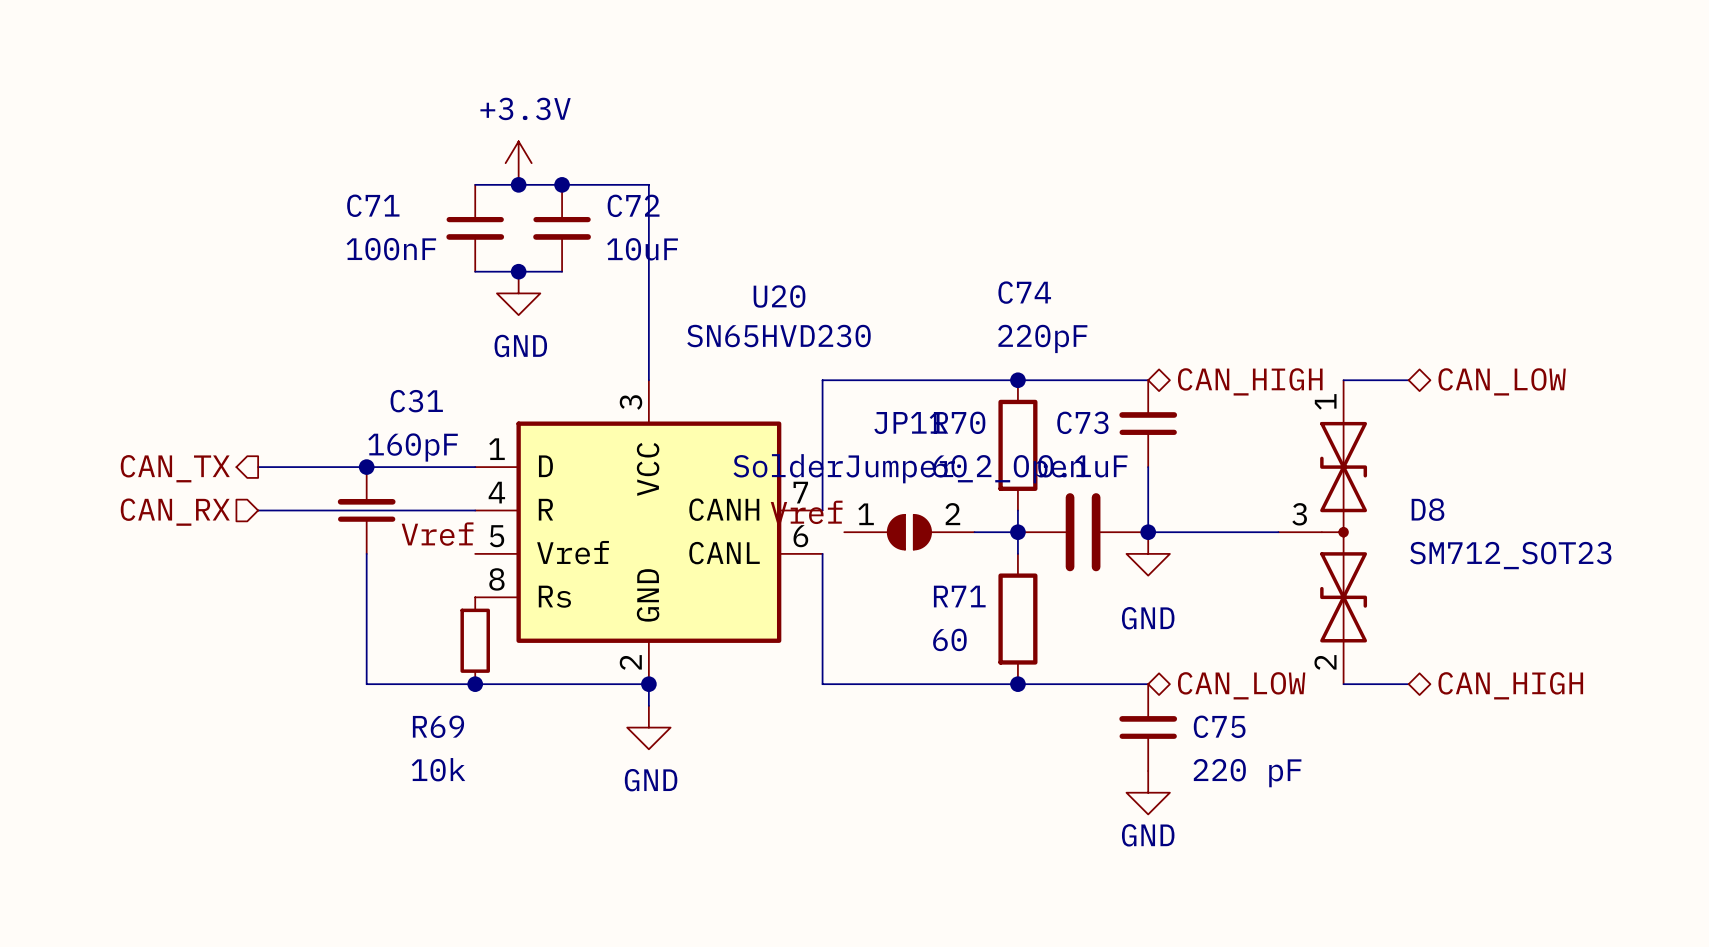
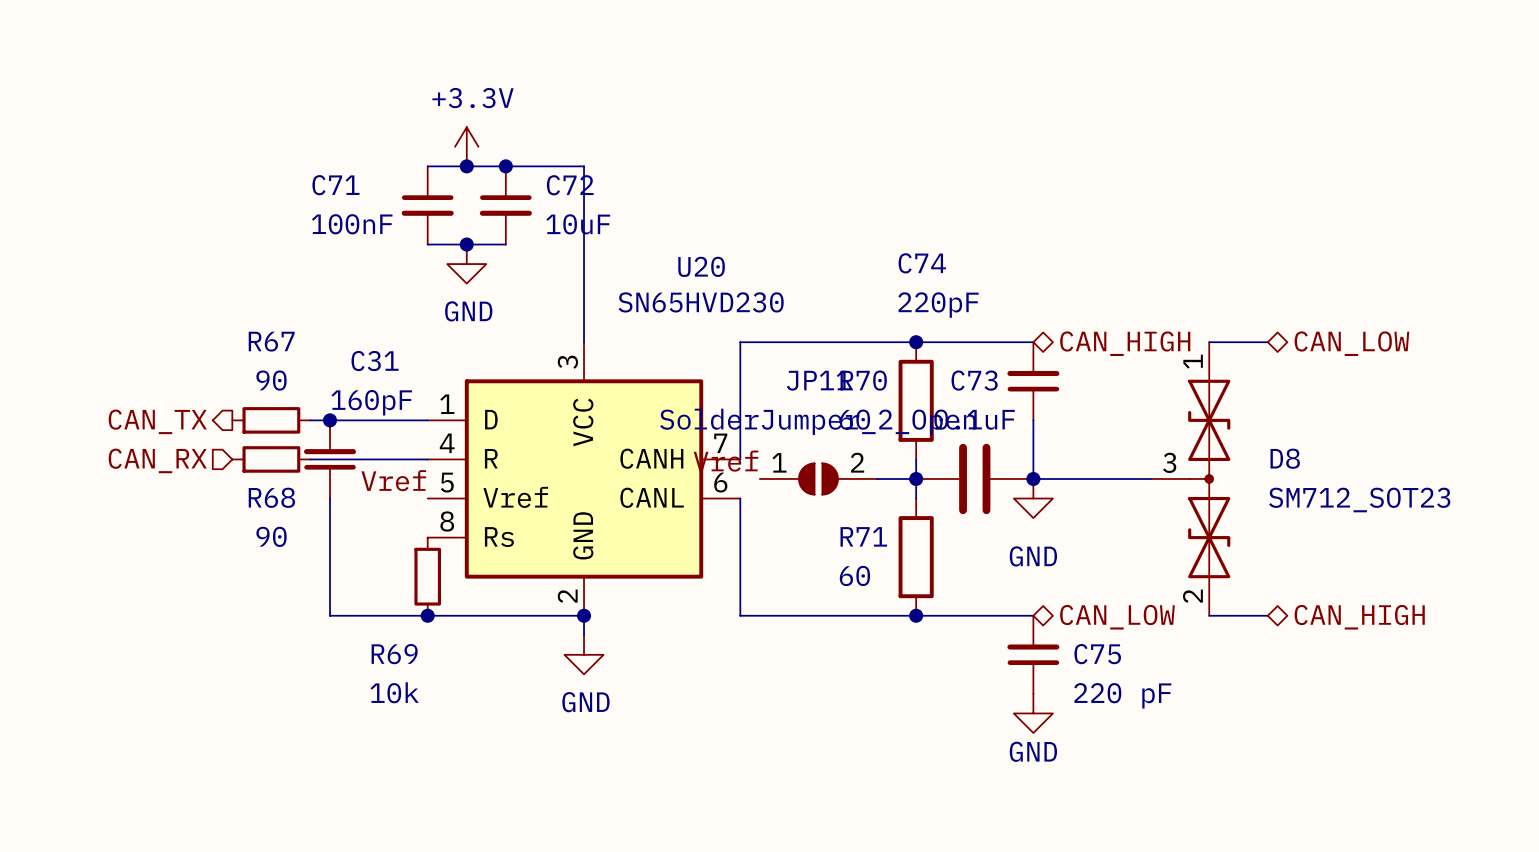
wire: (258, 467) (344, 467) -> none
R67: none -> 90 (271, 420)
wire: (258, 510) (344, 510) -> none
R68: none -> 90 (271, 459)

